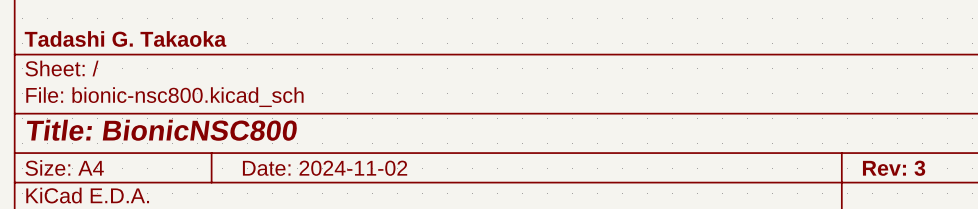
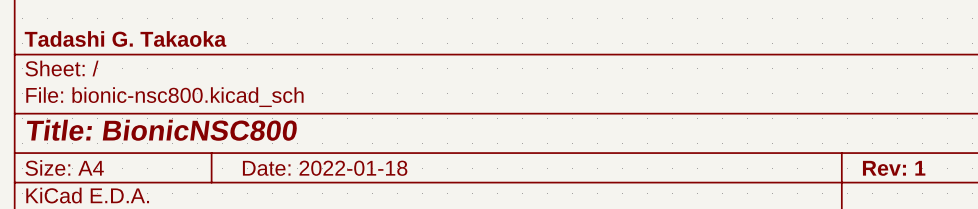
title block: Date: 2024-11-02 (325, 168) -> Date: 2022-01-18 (325, 168)
title block: Rev: 3 (894, 168) -> Rev: 1 (894, 168)

